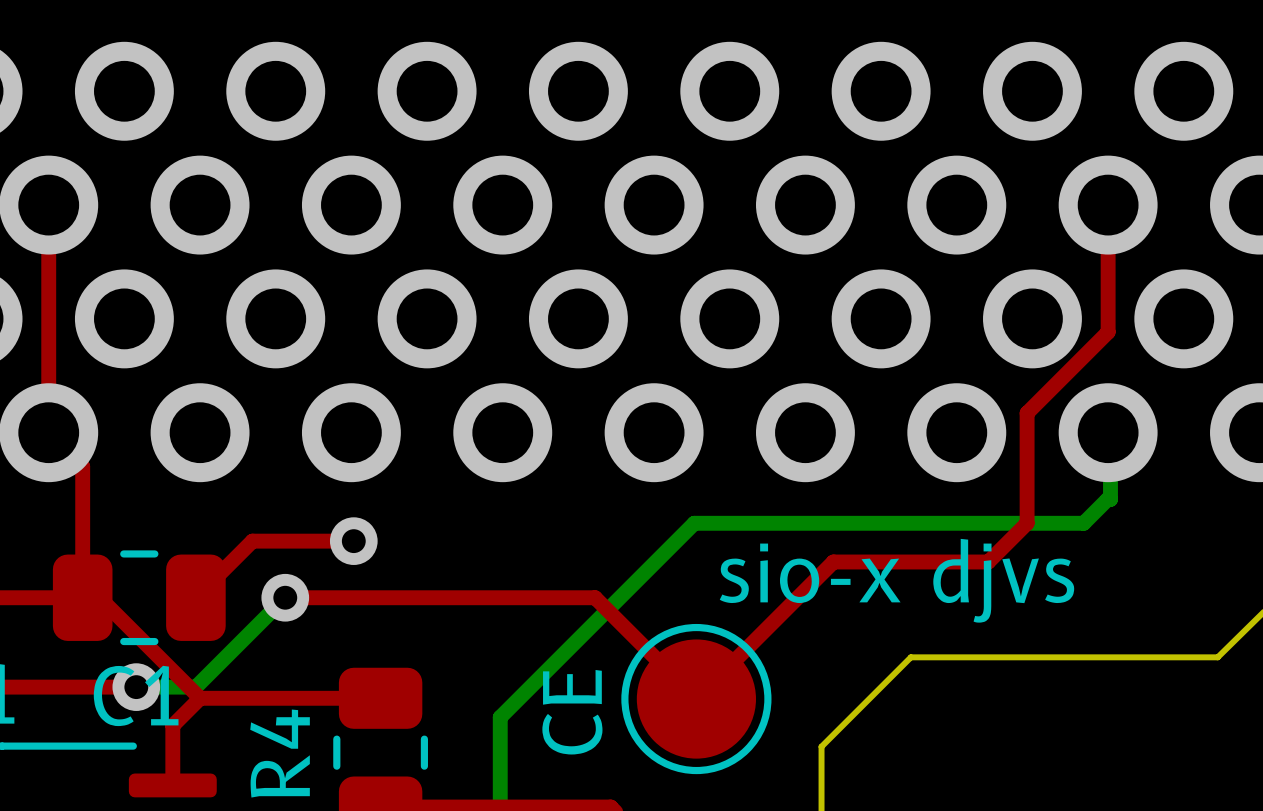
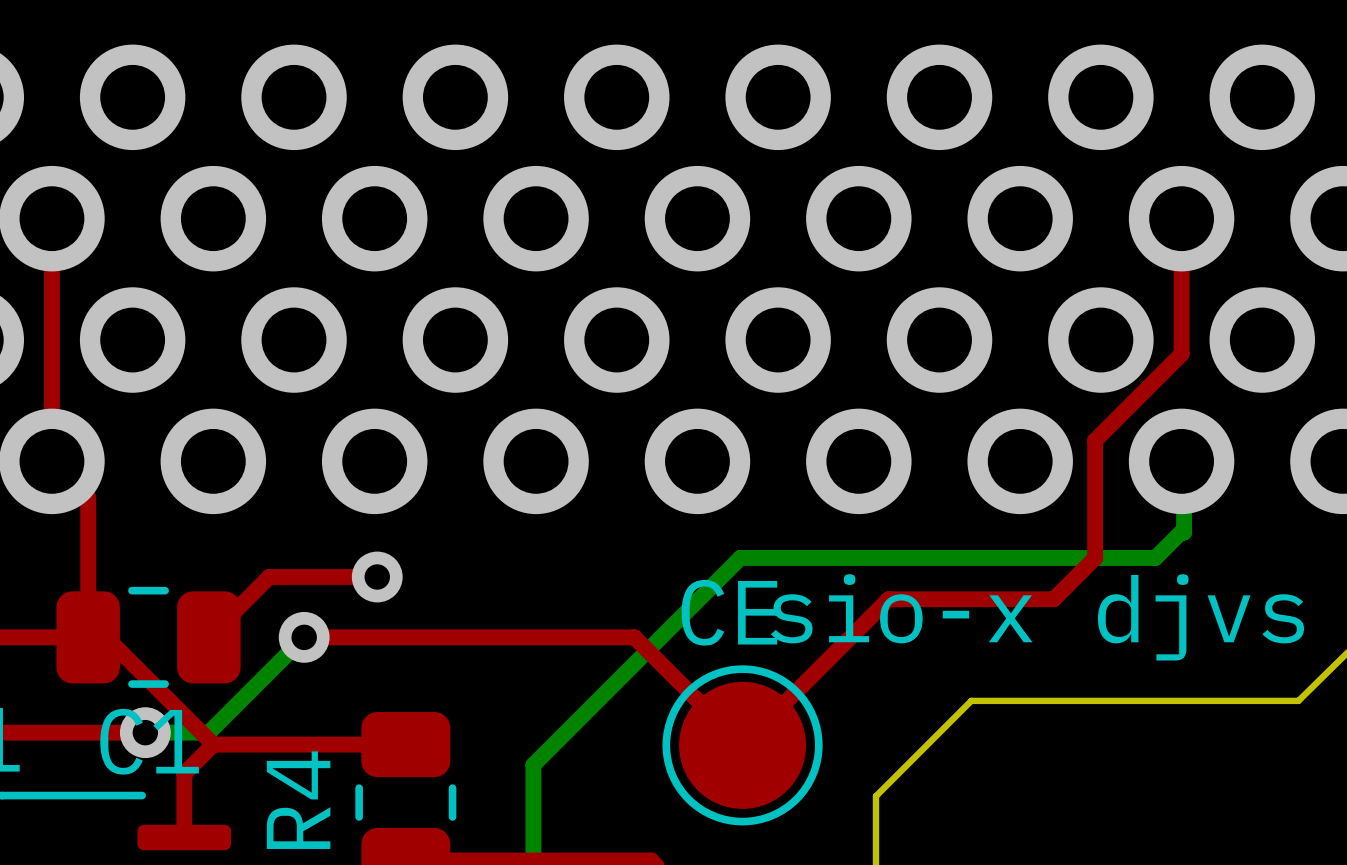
part value rotation: 0° (572, 712) -> 90° clockwise (729, 612)
part value position: CE (572, 712) -> CE (729, 612)

